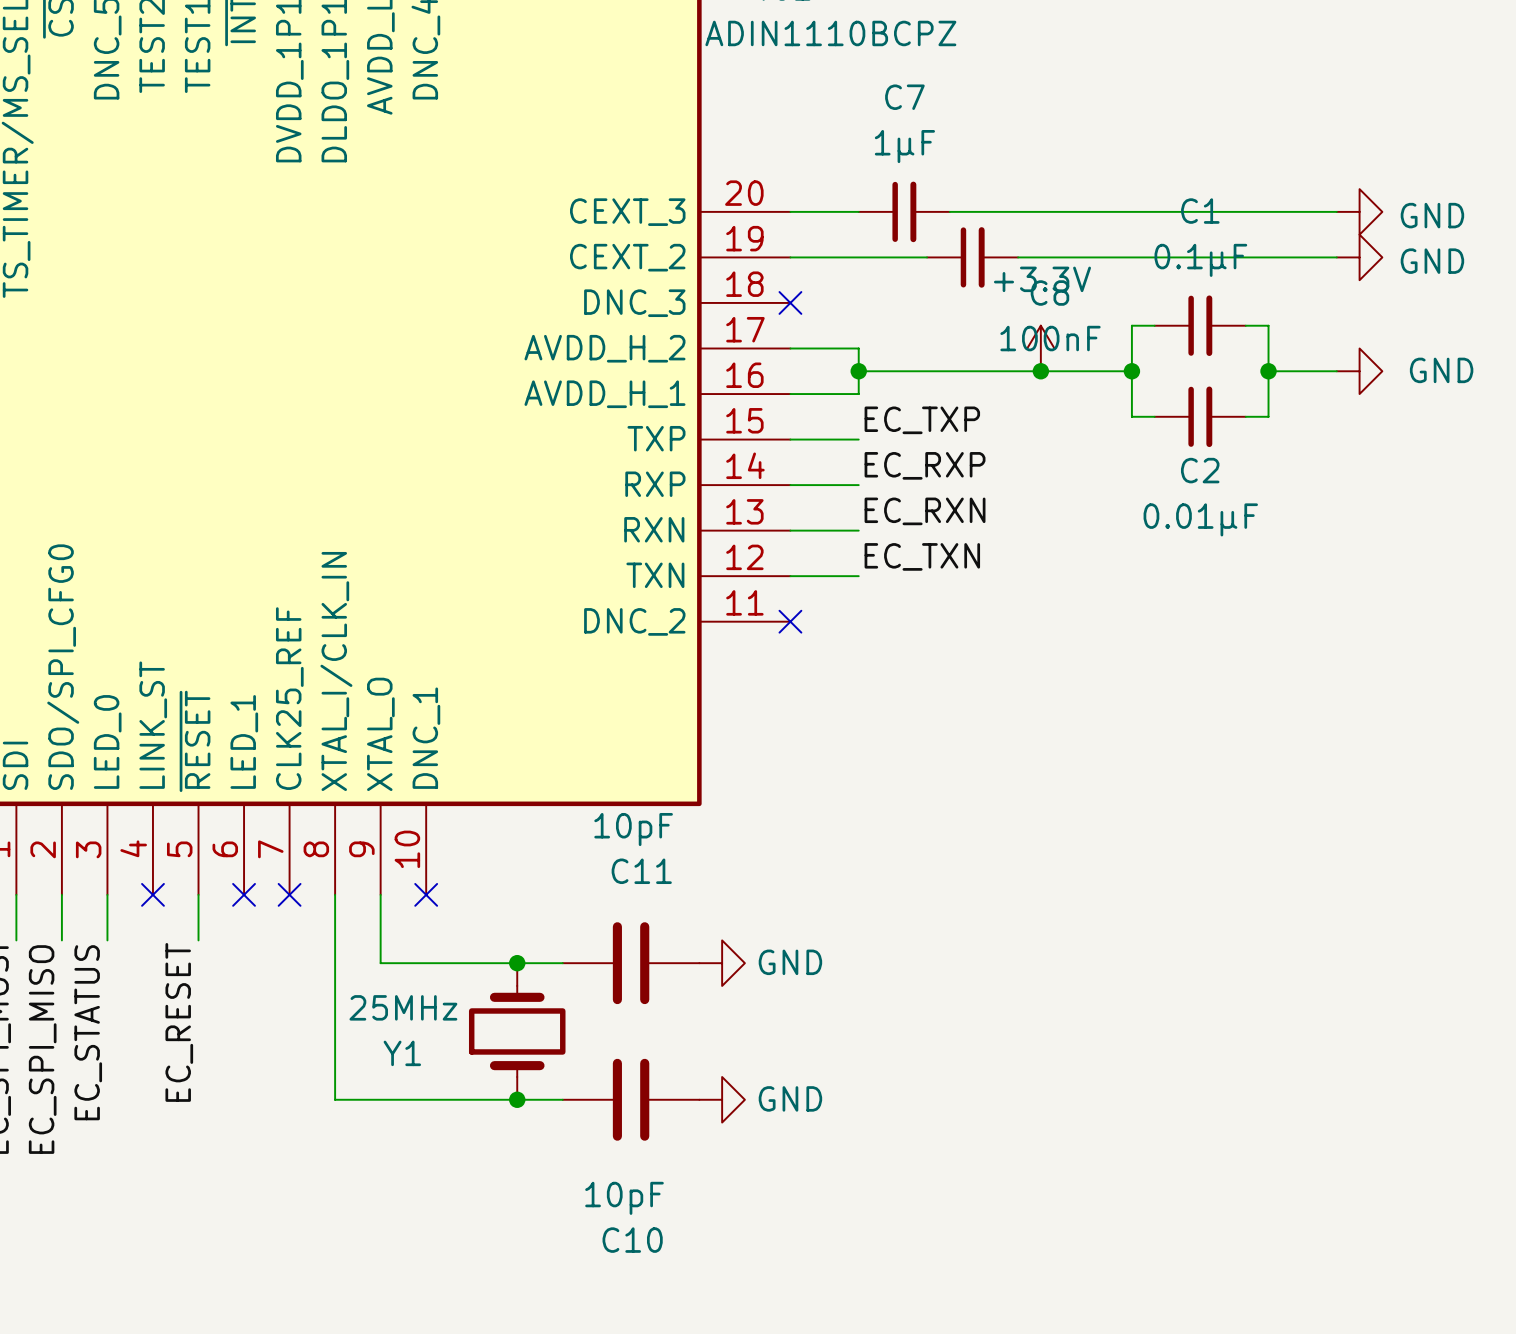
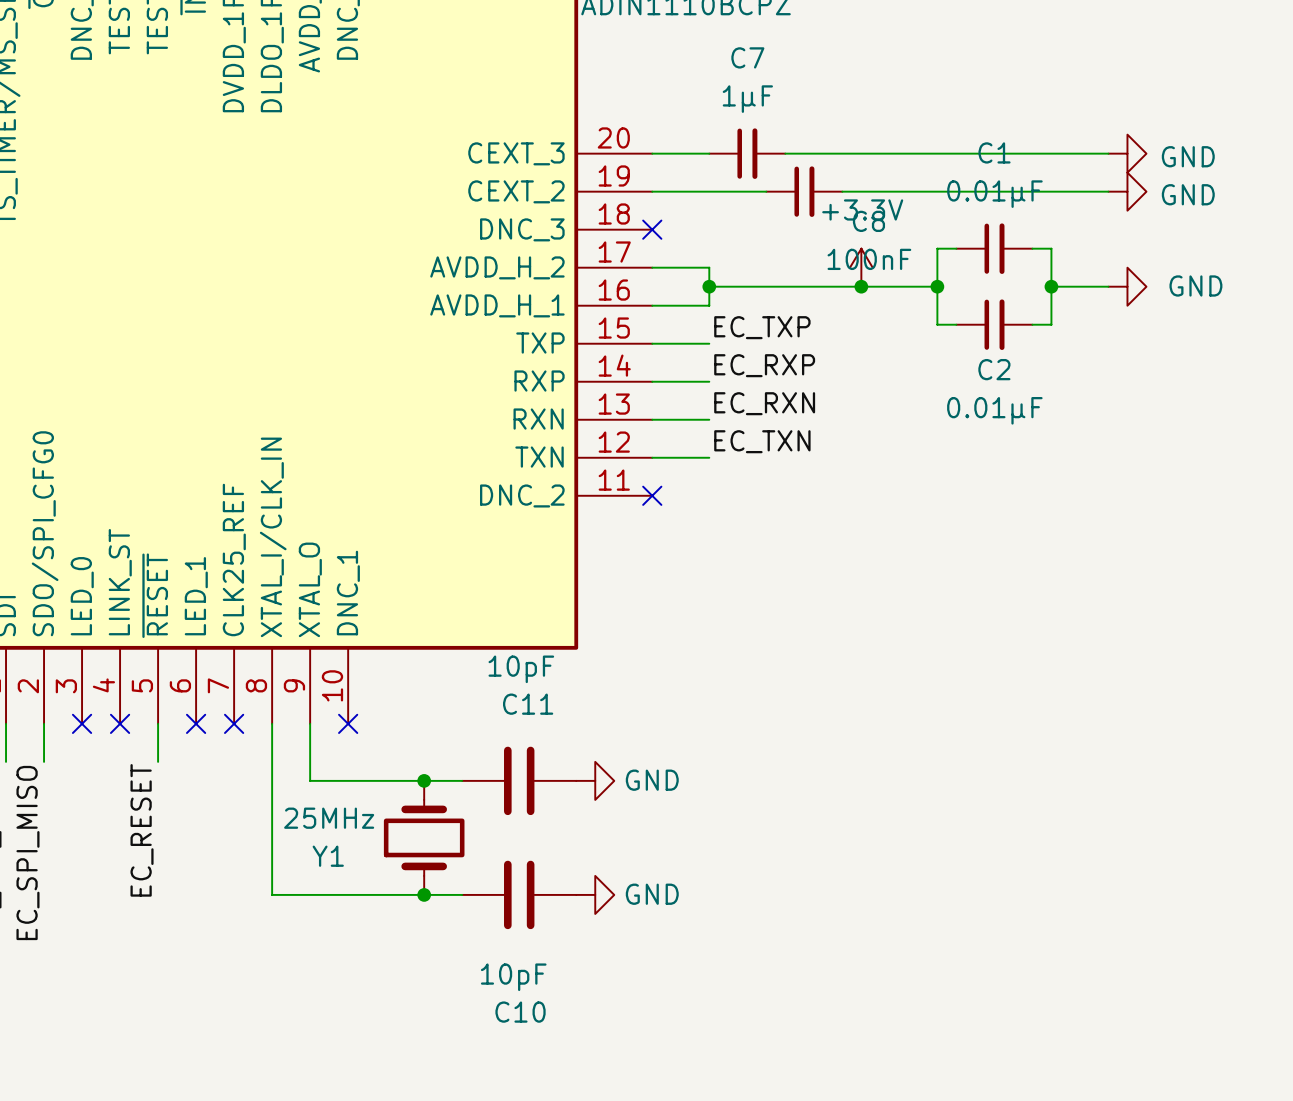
C1 value: 0.1μF (1200, 260) -> 0.01μF (994, 194)
wire: (107, 894) (107, 940) -> none
no-connect mark: none -> (82, 723)
label: EC_STATUS (88, 1032) -> none

